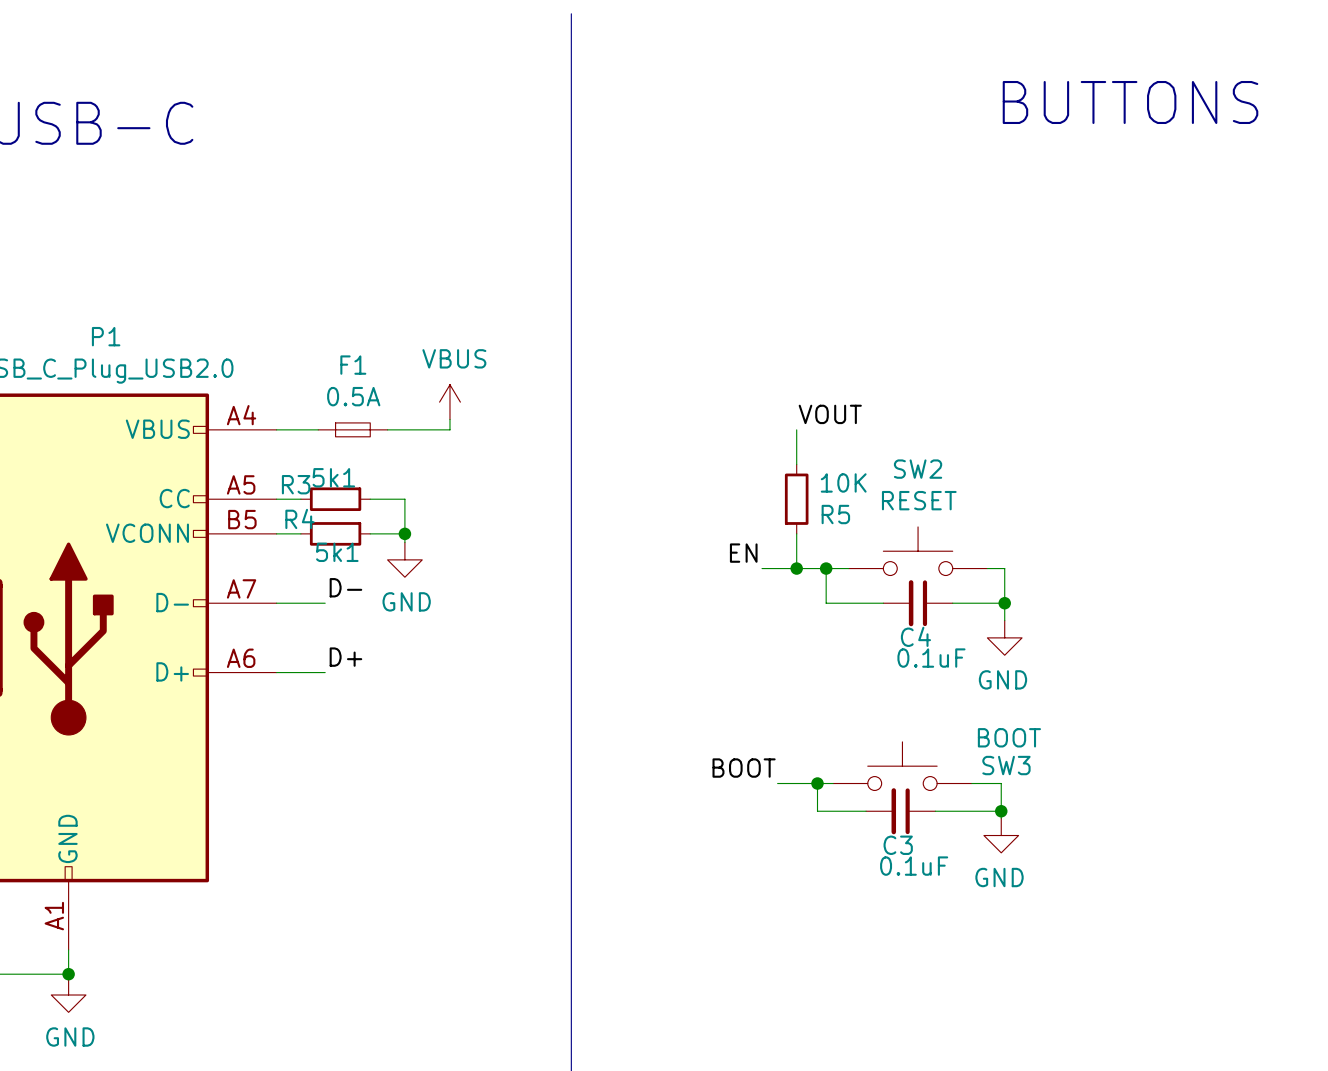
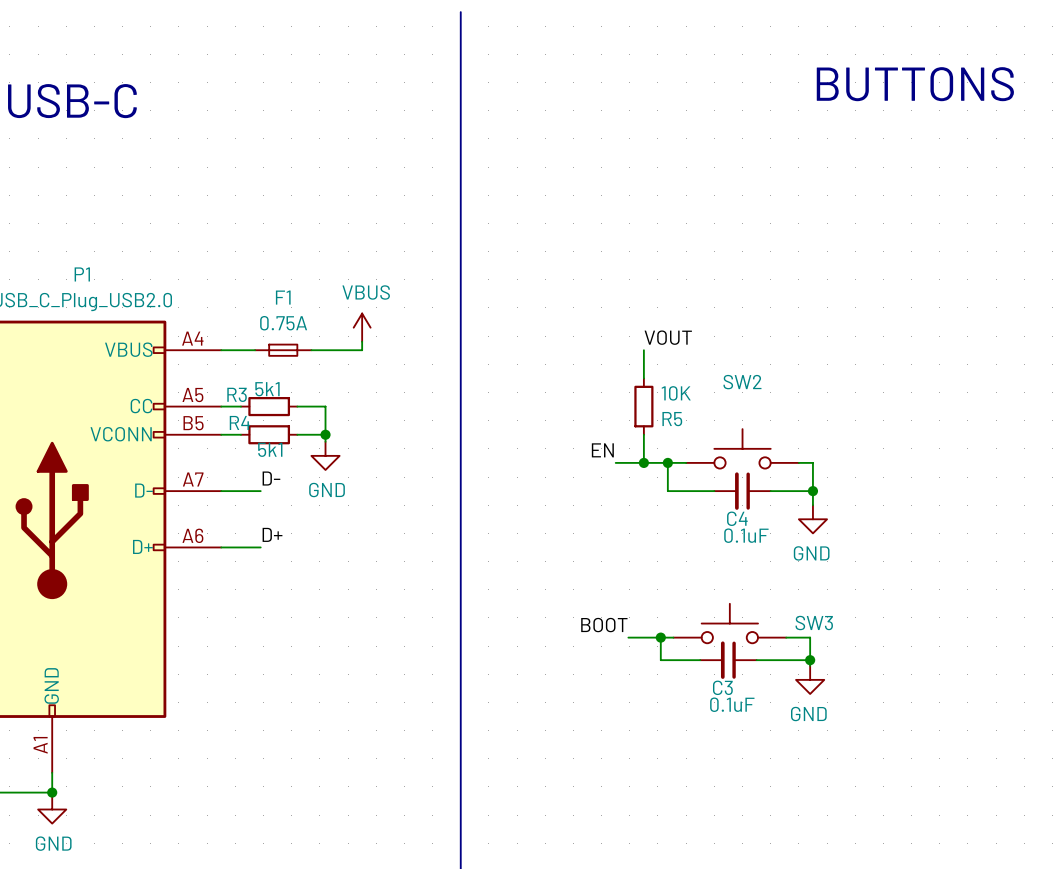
F1 value: 0.5A (353, 396) -> 0.75A (283, 323)
SW2 value: RESET (919, 500) -> none
SW3 value: BOOT (1009, 737) -> none

